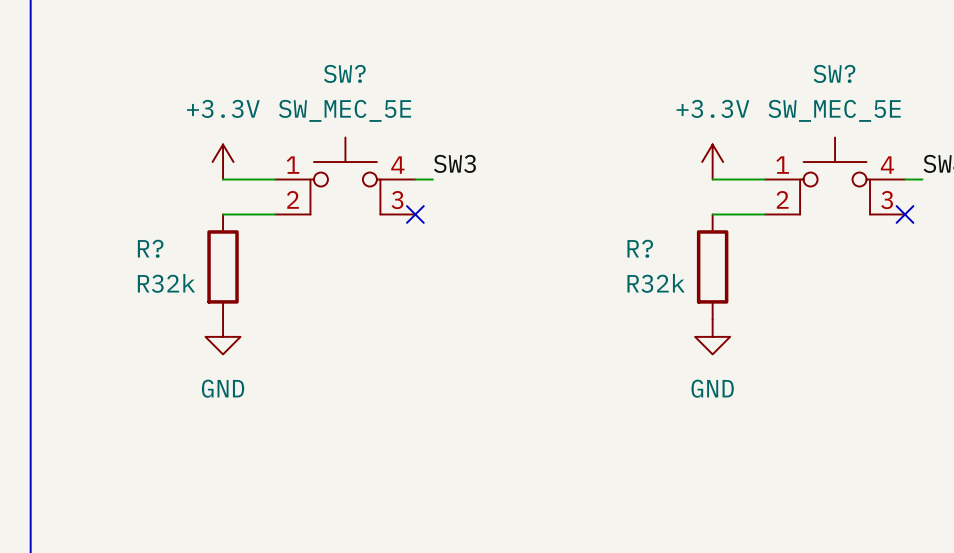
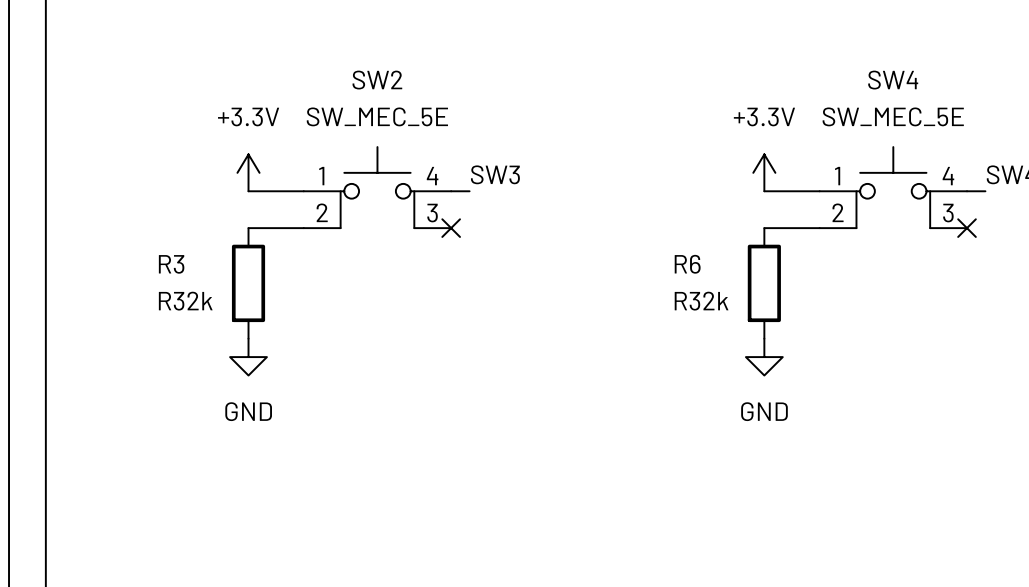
SW? name: SW? (344, 73) -> SW2 (377, 80)
SW? name: SW? (834, 73) -> SW4 (893, 80)
R? name: R? (150, 248) -> R3 (171, 264)
R? name: R? (640, 248) -> R6 (687, 264)

